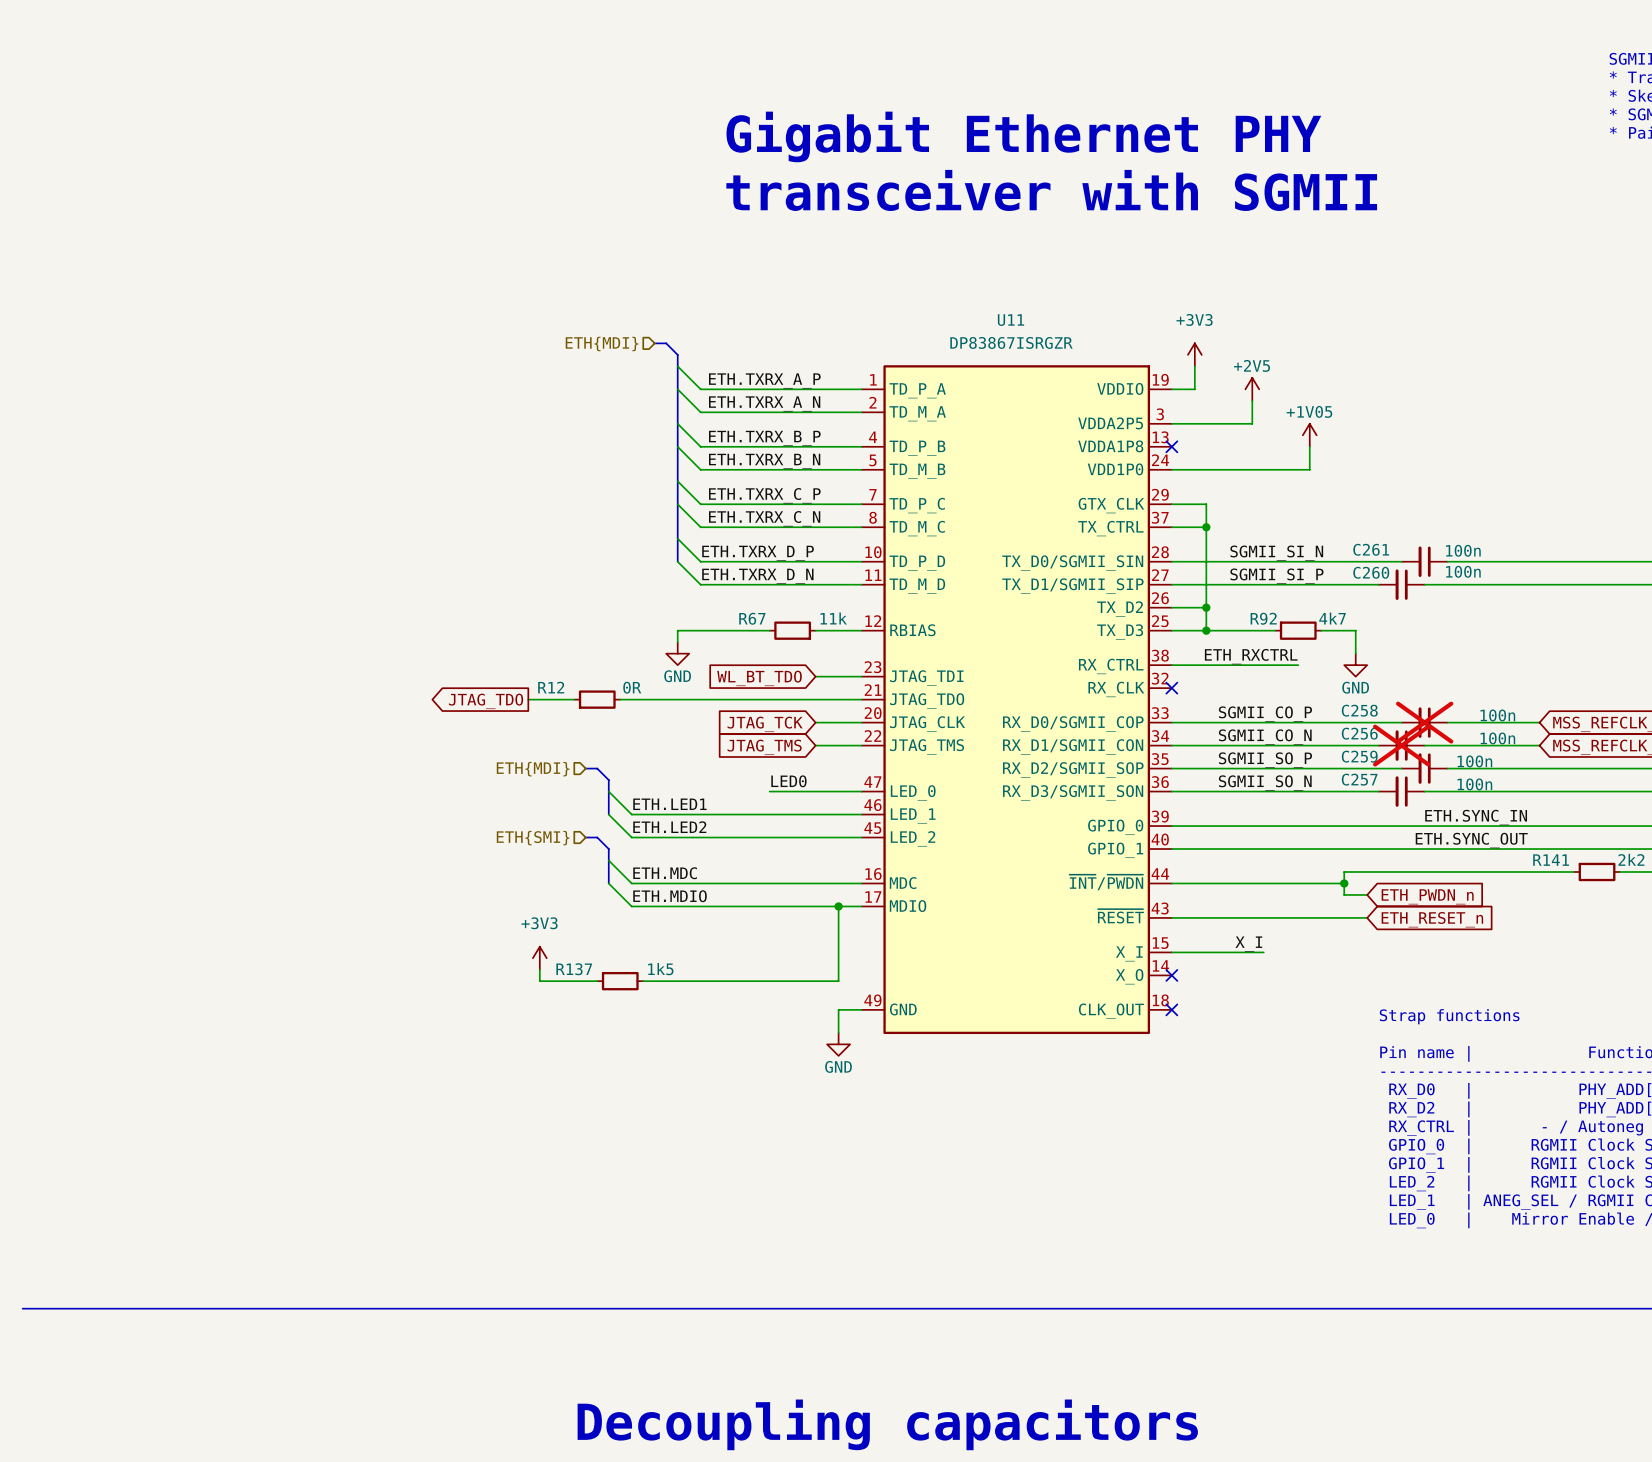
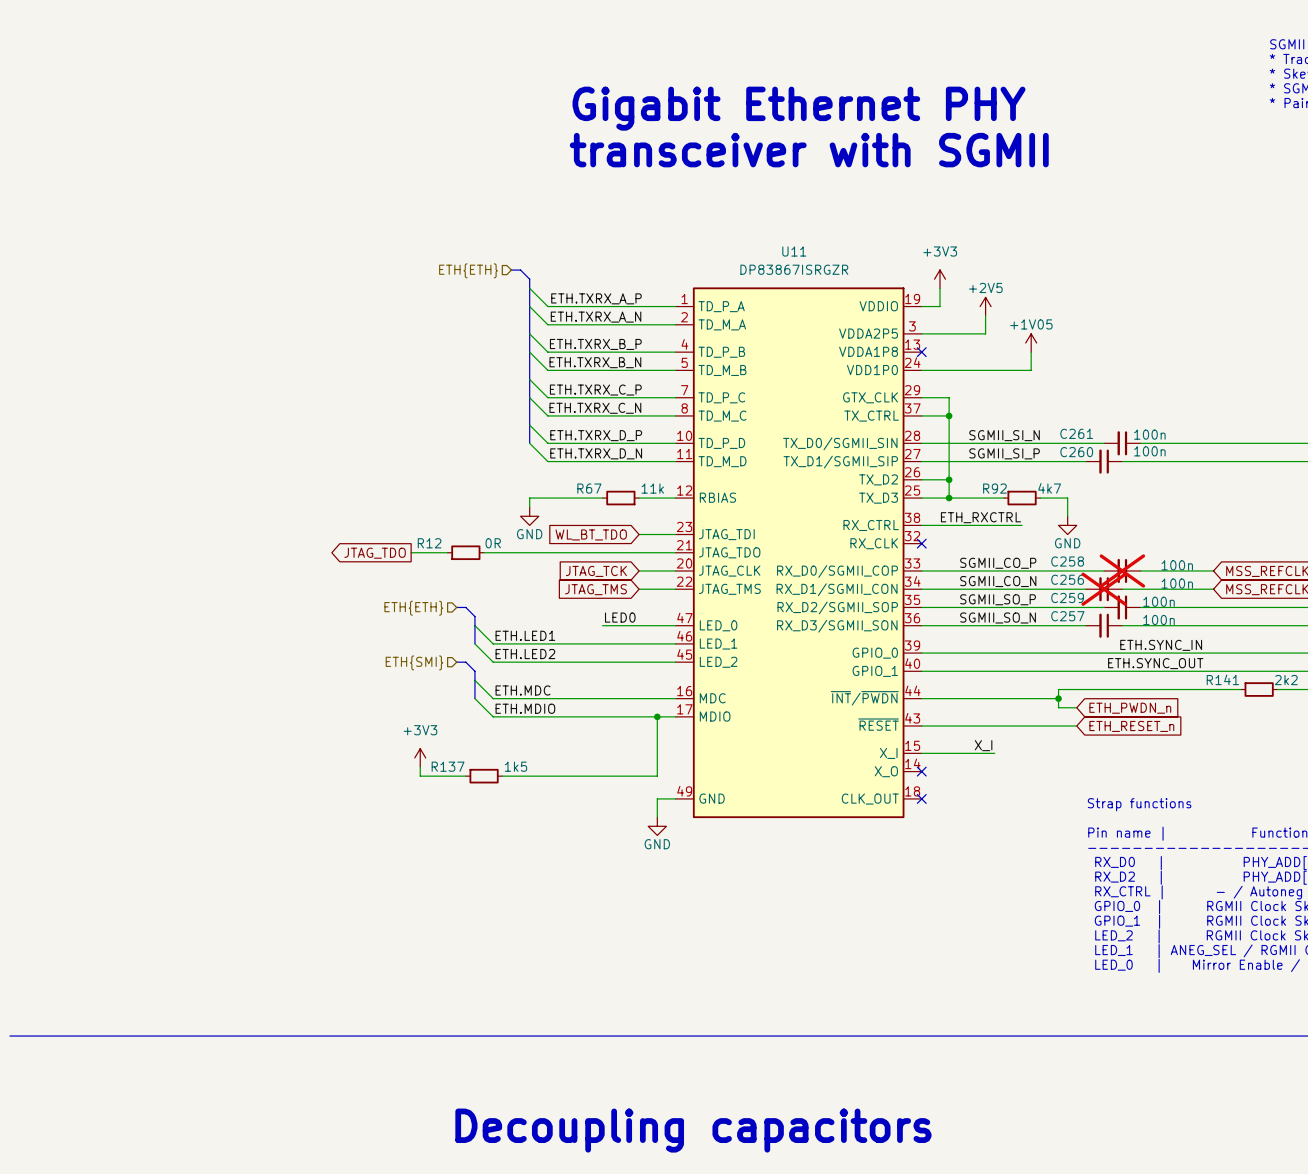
hierarchical label: ETH{MDI} (602, 343) -> ETH{ETH} (468, 270)
hierarchical label: ETH{MDI} (533, 769) -> ETH{ETH} (413, 608)

